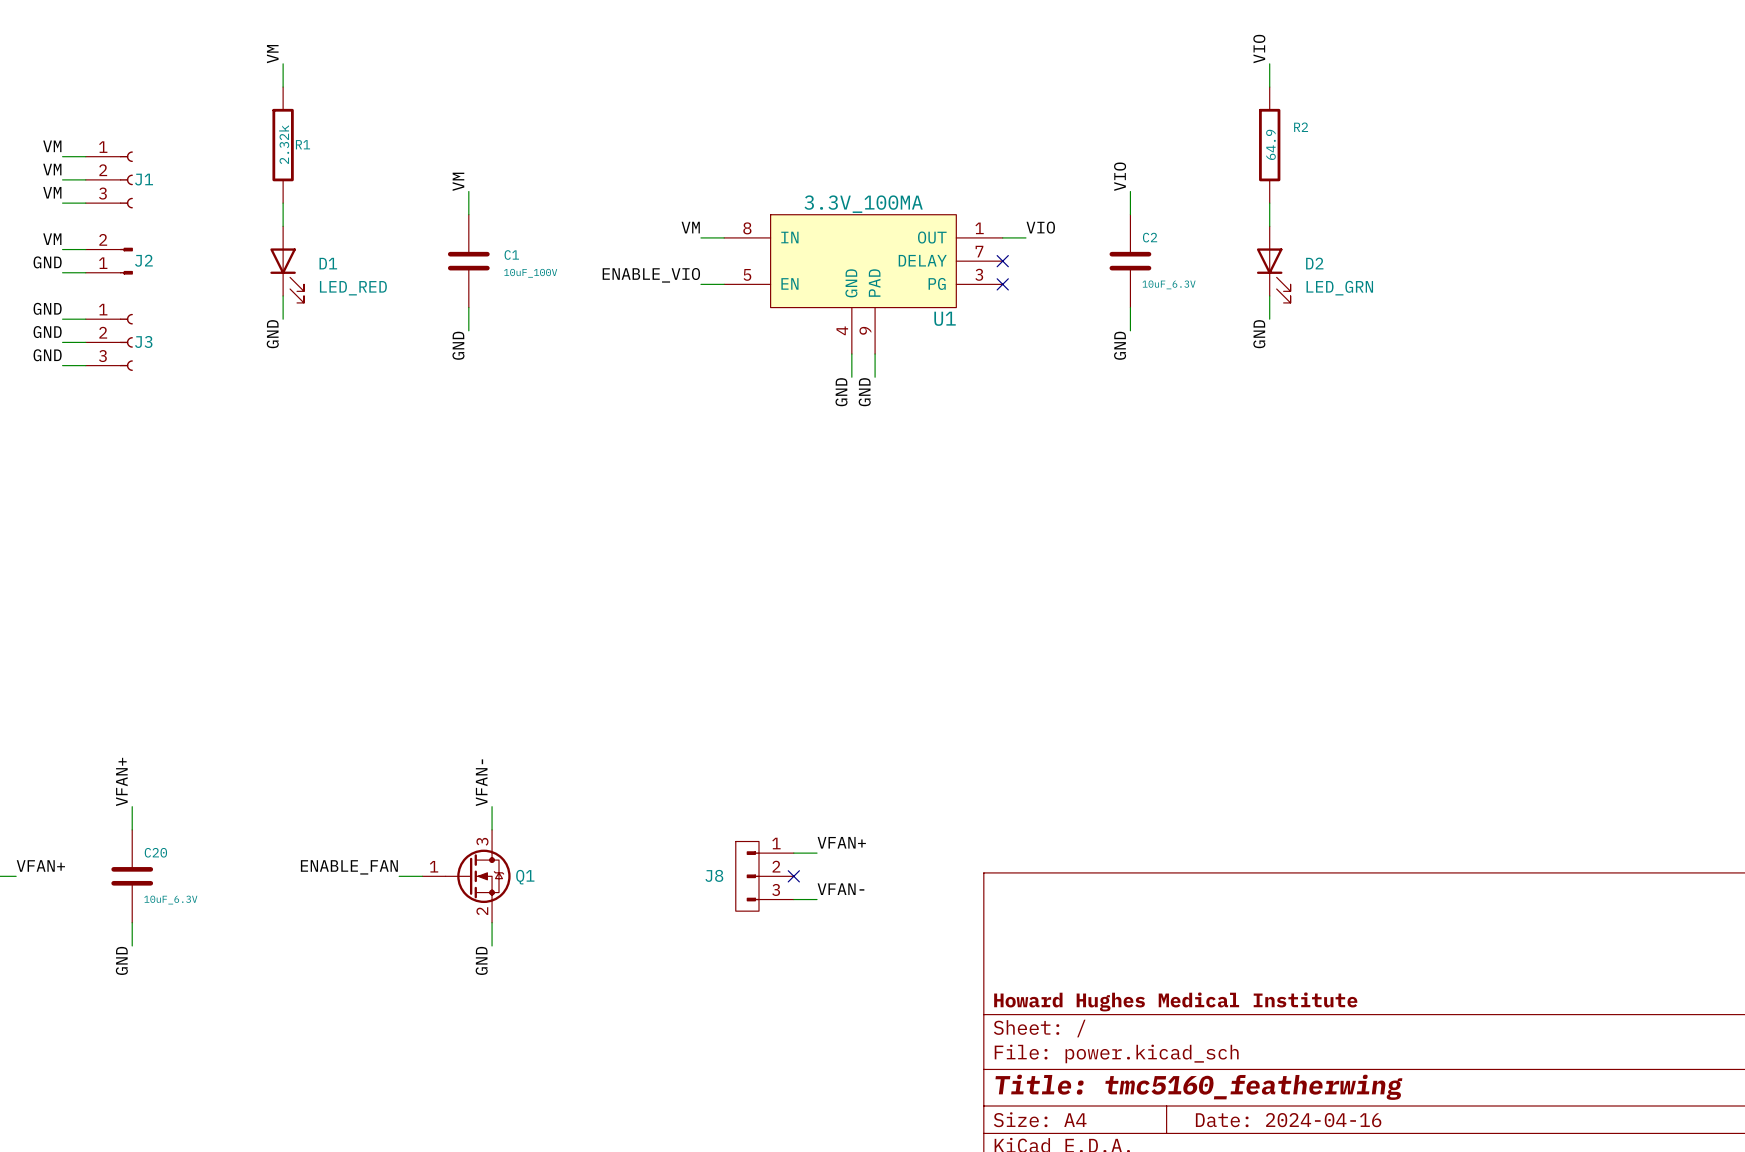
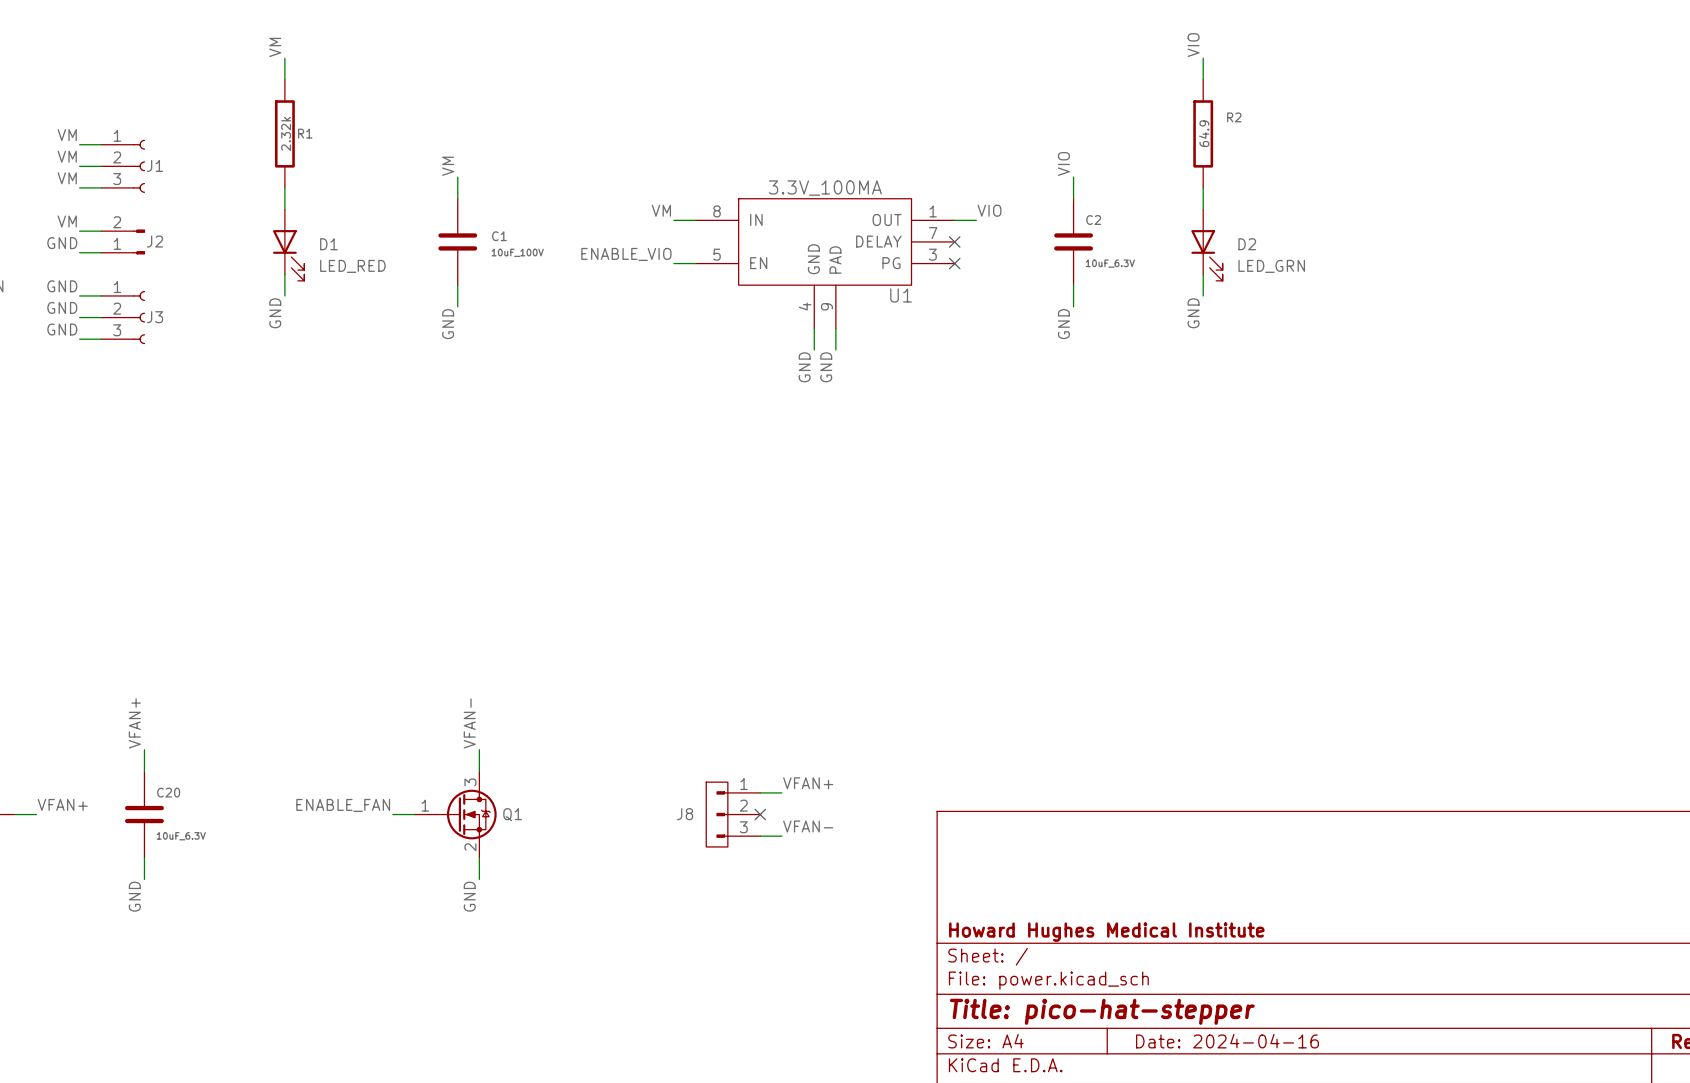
title block: Title: tmc5160_featherwing (1198, 1087) -> Title: pico-hat-stepper (1102, 1011)

